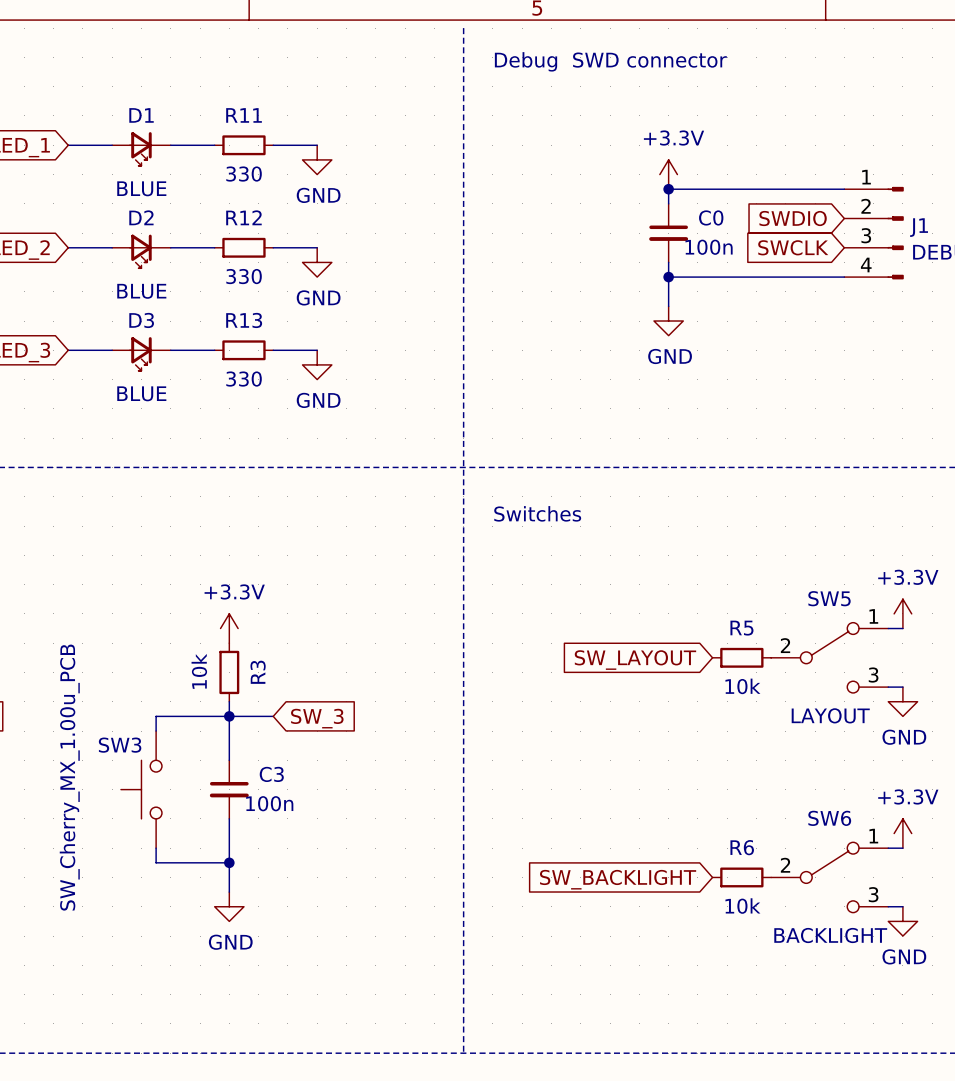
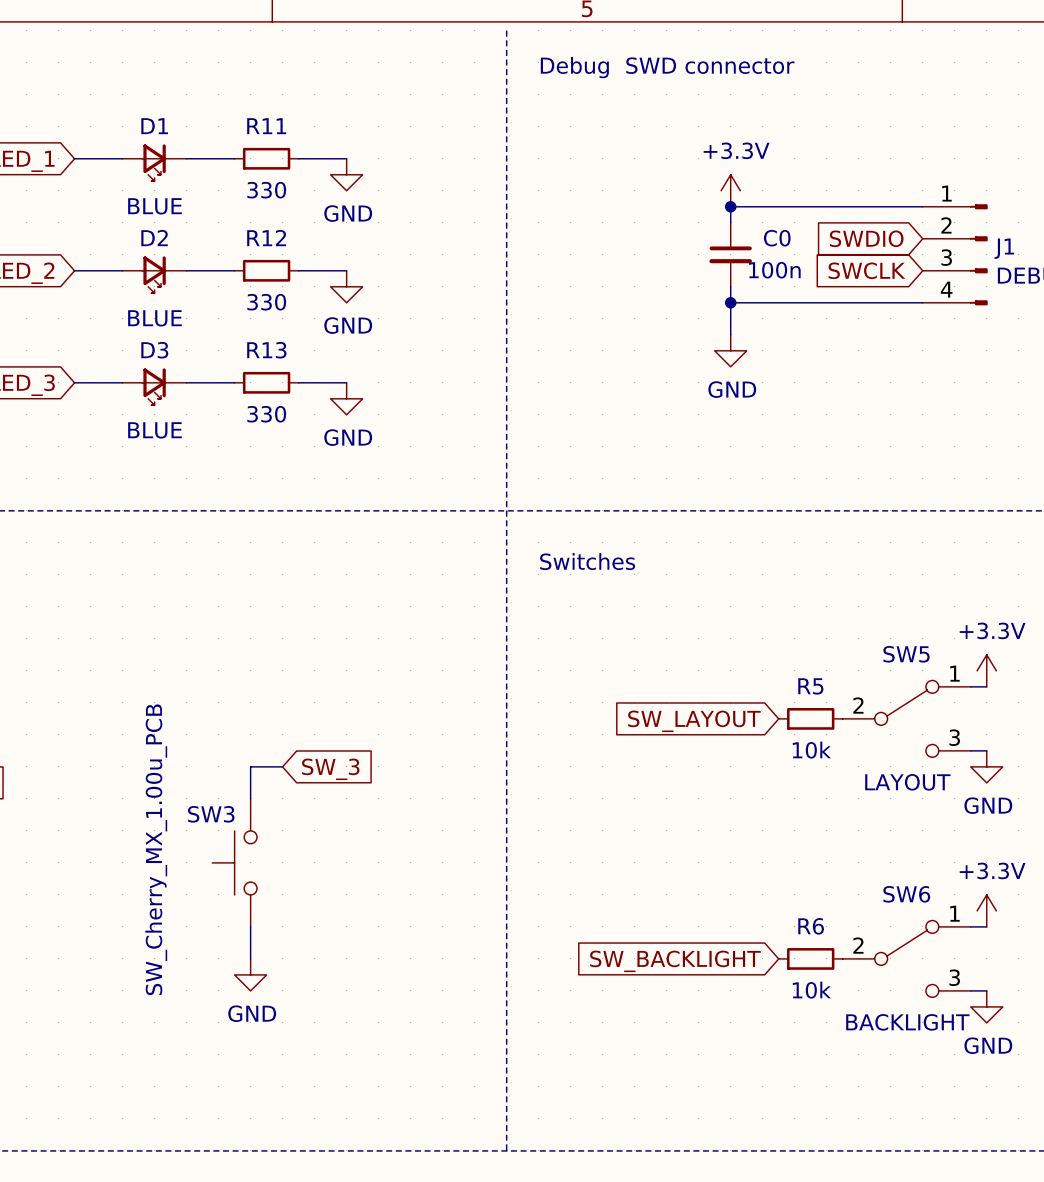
power symbol: +3.3V (229, 628) -> none
R3: 10k (229, 672) -> none
wire: none -> (250, 766) (282, 766)
junction: (229, 716) -> none
wire: (273, 716) (156, 716) (156, 731) -> none
global label position: SW_3 (317, 718) -> SW_3 (330, 769)
SW3 position: (141, 789) -> (234, 862)
C3: 100n (229, 789) -> none
wire: (156, 848) (156, 862) (229, 862) -> none
junction: (229, 862) -> none
power symbol position: GND (229, 906) -> GND (250, 974)

